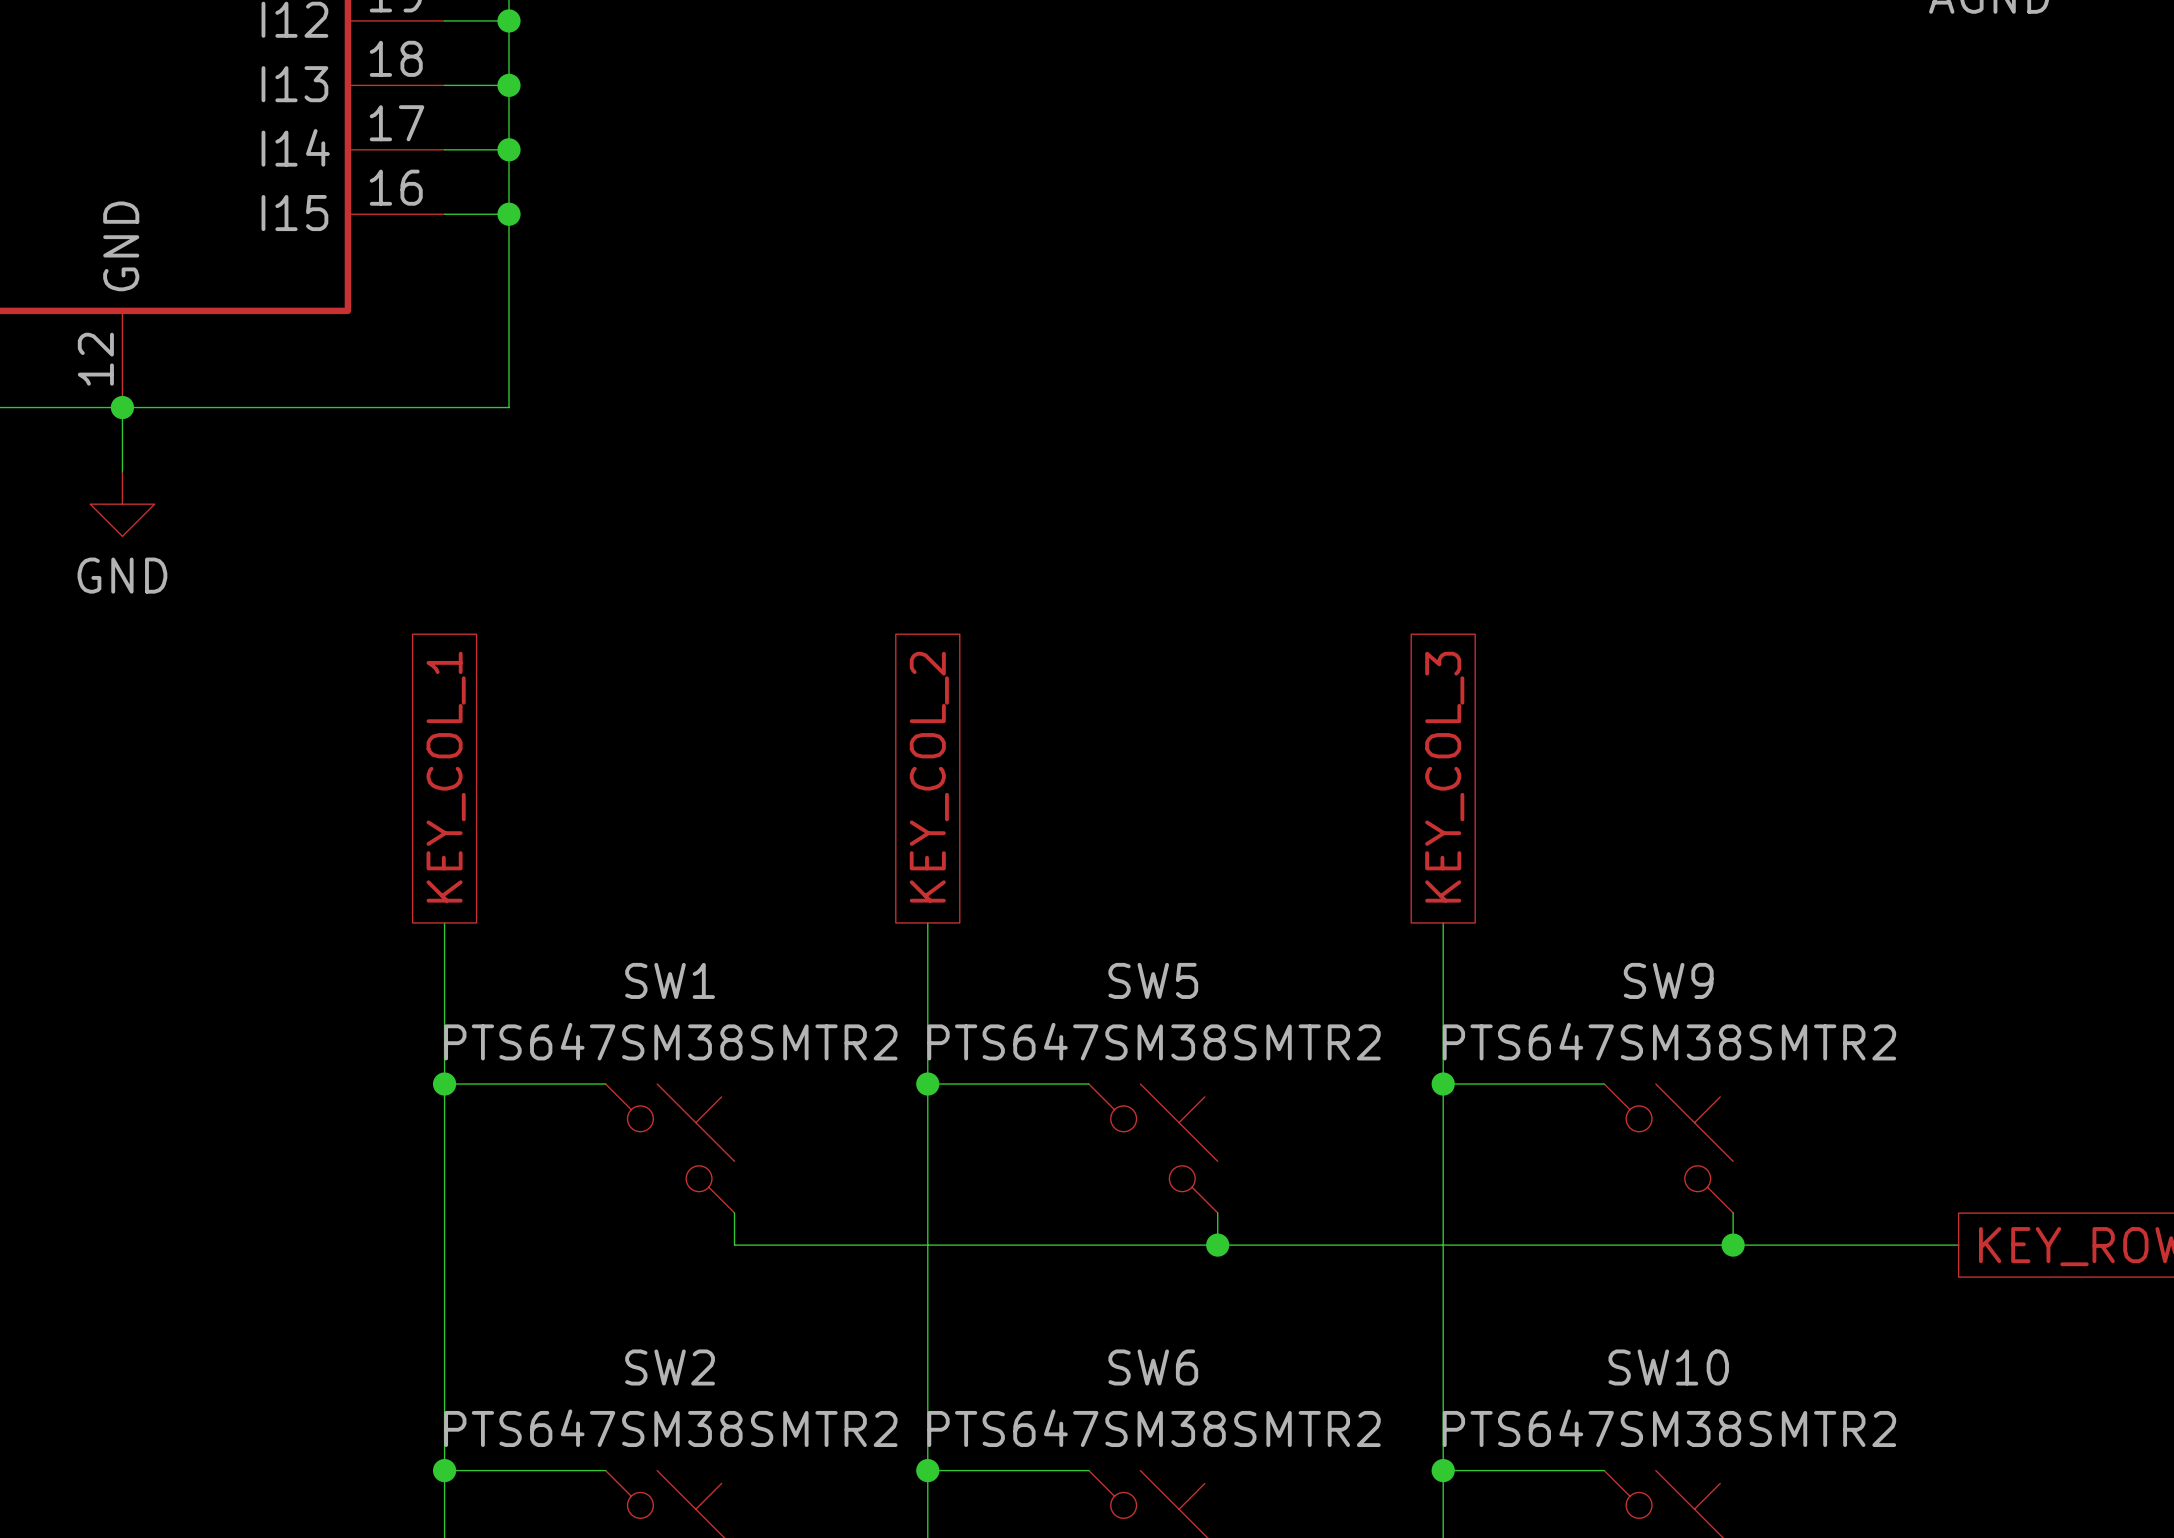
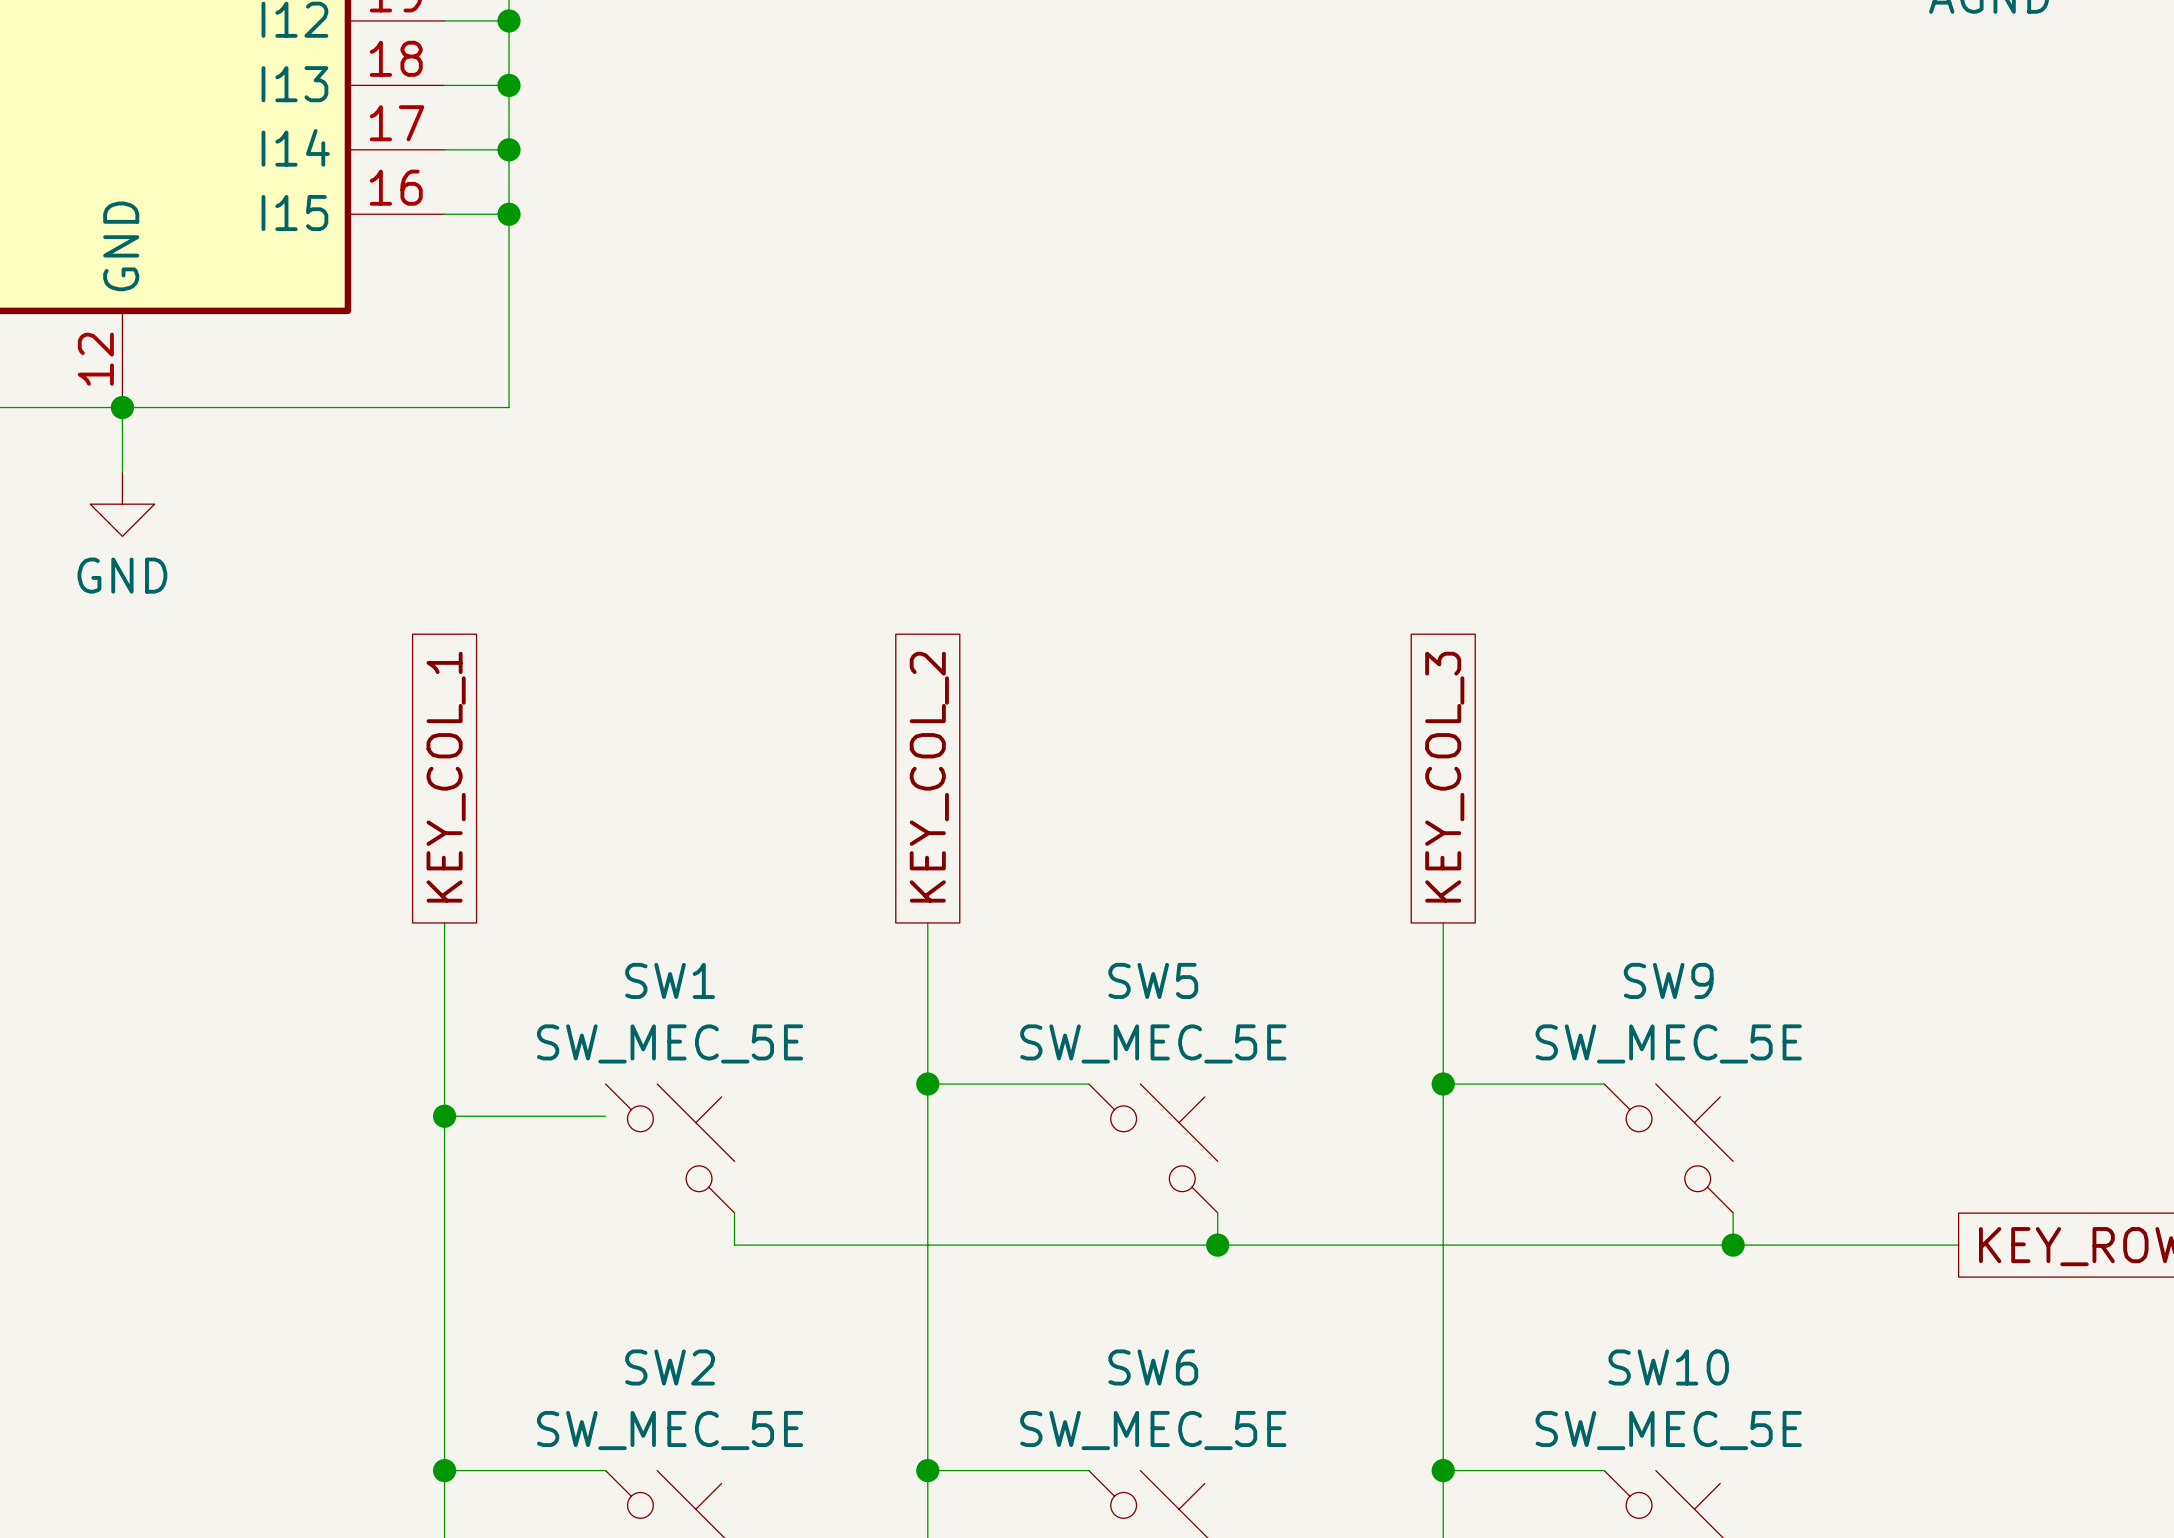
SW1 value: PTS647SM38SMTR2 (670, 1041) -> SW_MEC_5E (670, 1043)
SW5 value: PTS647SM38SMTR2 (1154, 1041) -> SW_MEC_5E (1153, 1043)
SW9 value: PTS647SM38SMTR2 (1669, 1041) -> SW_MEC_5E (1668, 1043)
wire: (444, 1084) (605, 1084) -> (444, 1116) (605, 1116)
junction position: (444, 1084) -> (444, 1116)
SW2 value: PTS647SM38SMTR2 (670, 1428) -> SW_MEC_5E (670, 1430)
SW6 value: PTS647SM38SMTR2 (1154, 1428) -> SW_MEC_5E (1153, 1430)
SW10 value: PTS647SM38SMTR2 (1669, 1428) -> SW_MEC_5E (1668, 1430)

